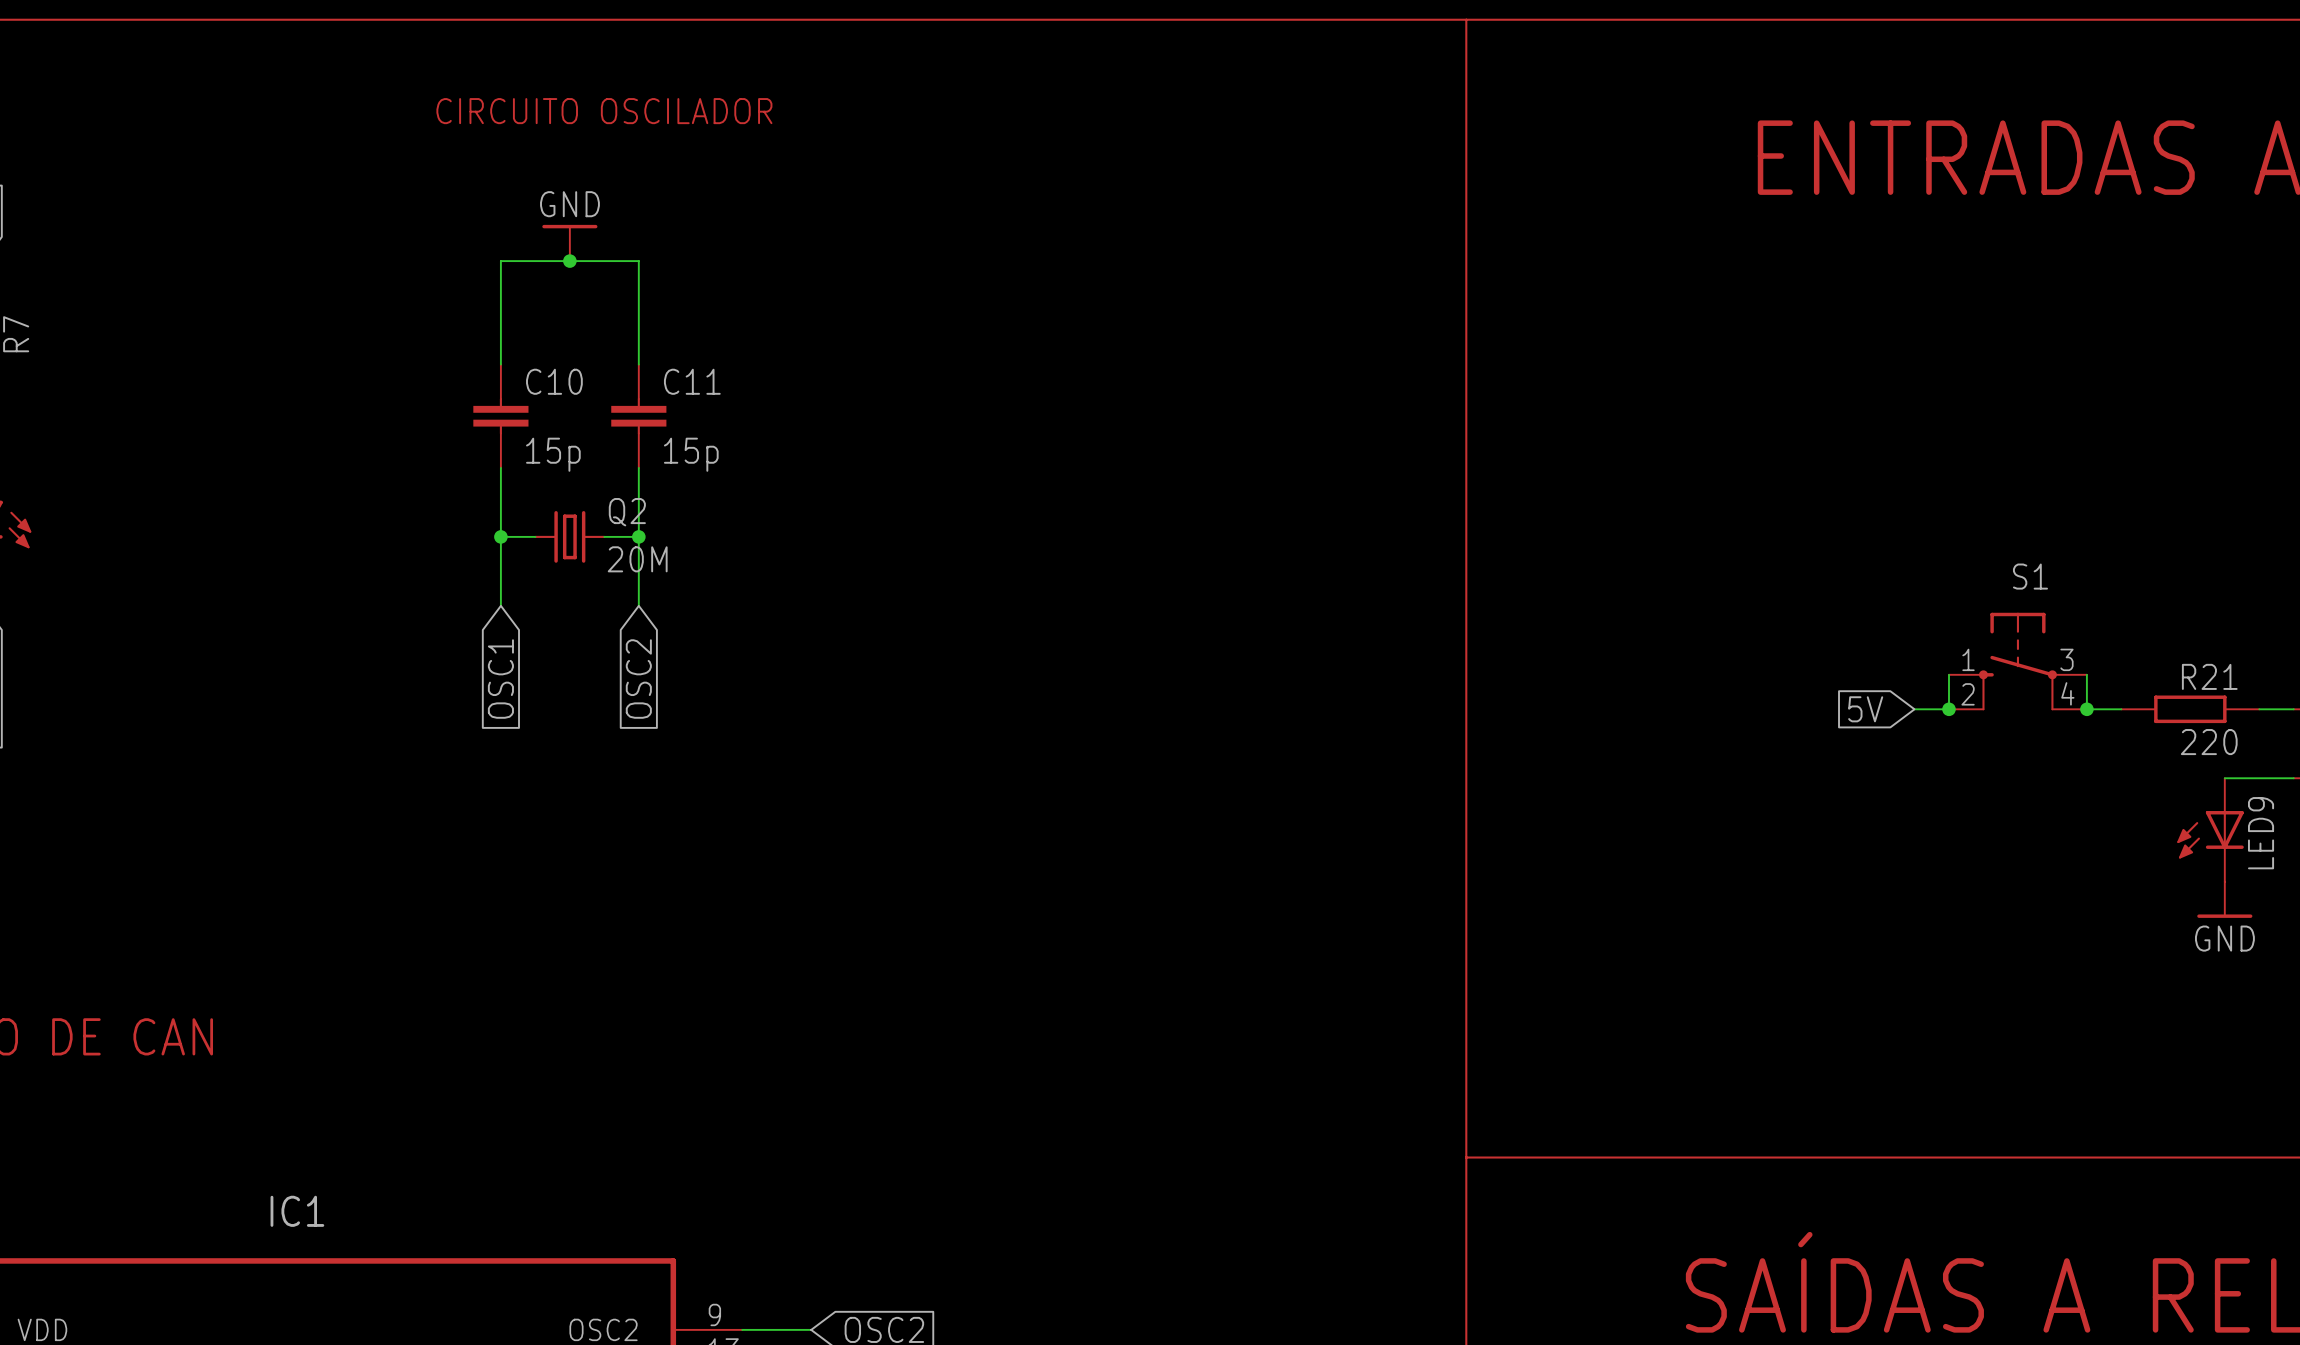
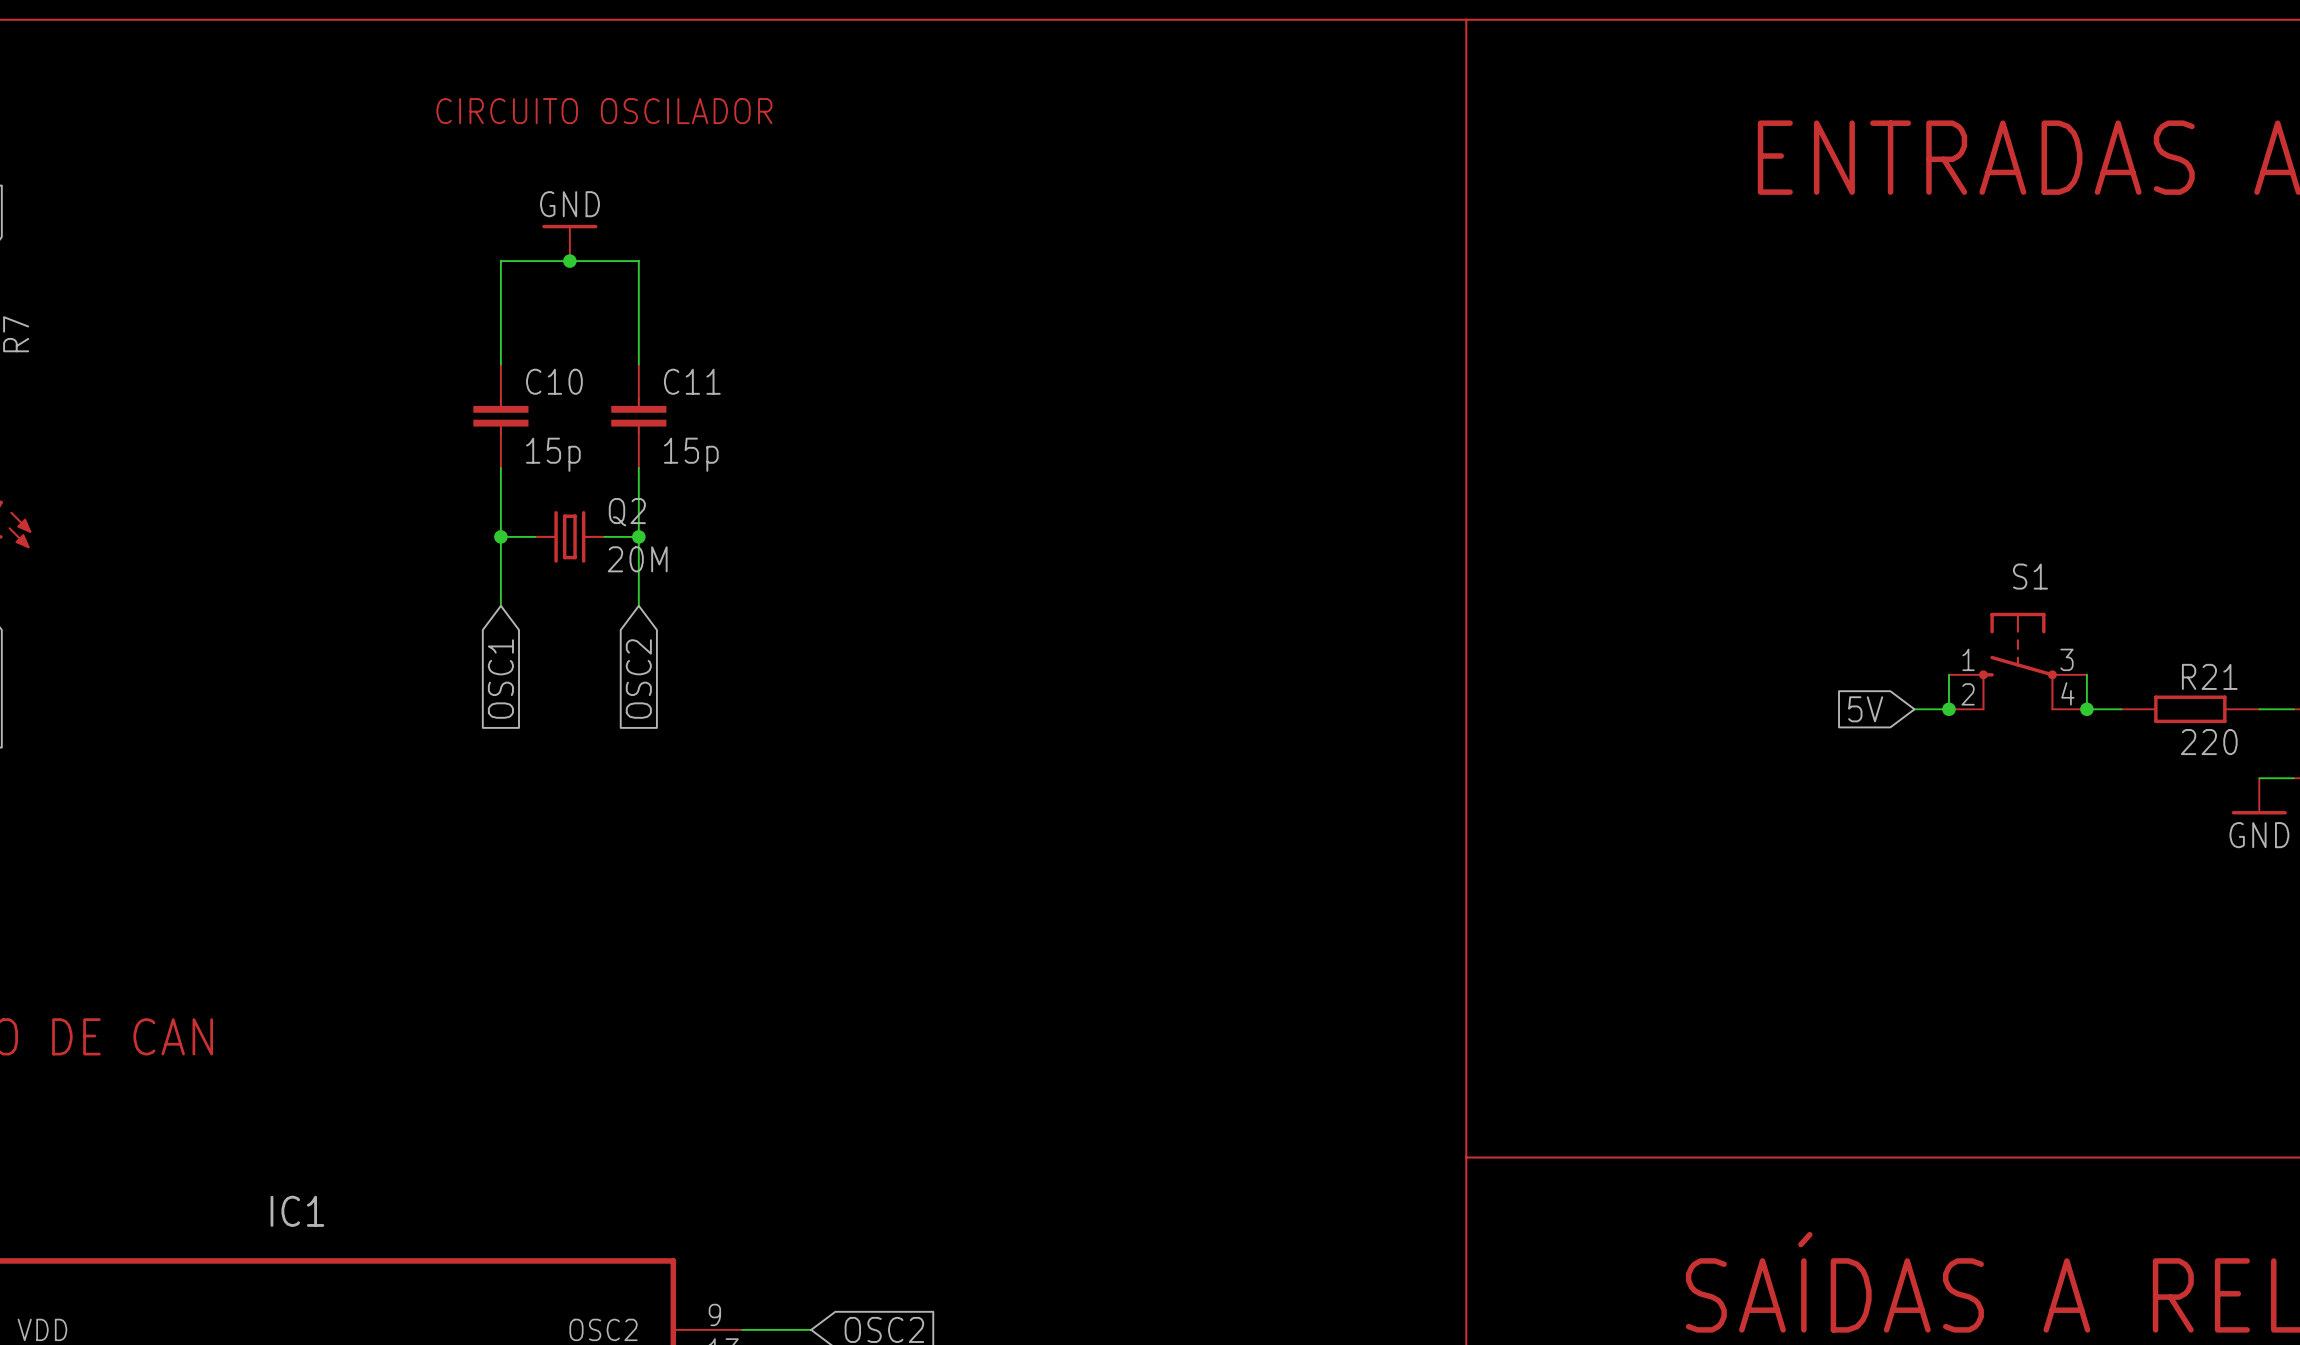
wire: (2224, 778) (2259, 778) -> none
LED9: (2210, 829) -> none
power symbol position: GND (2224, 899) -> GND (2259, 796)

